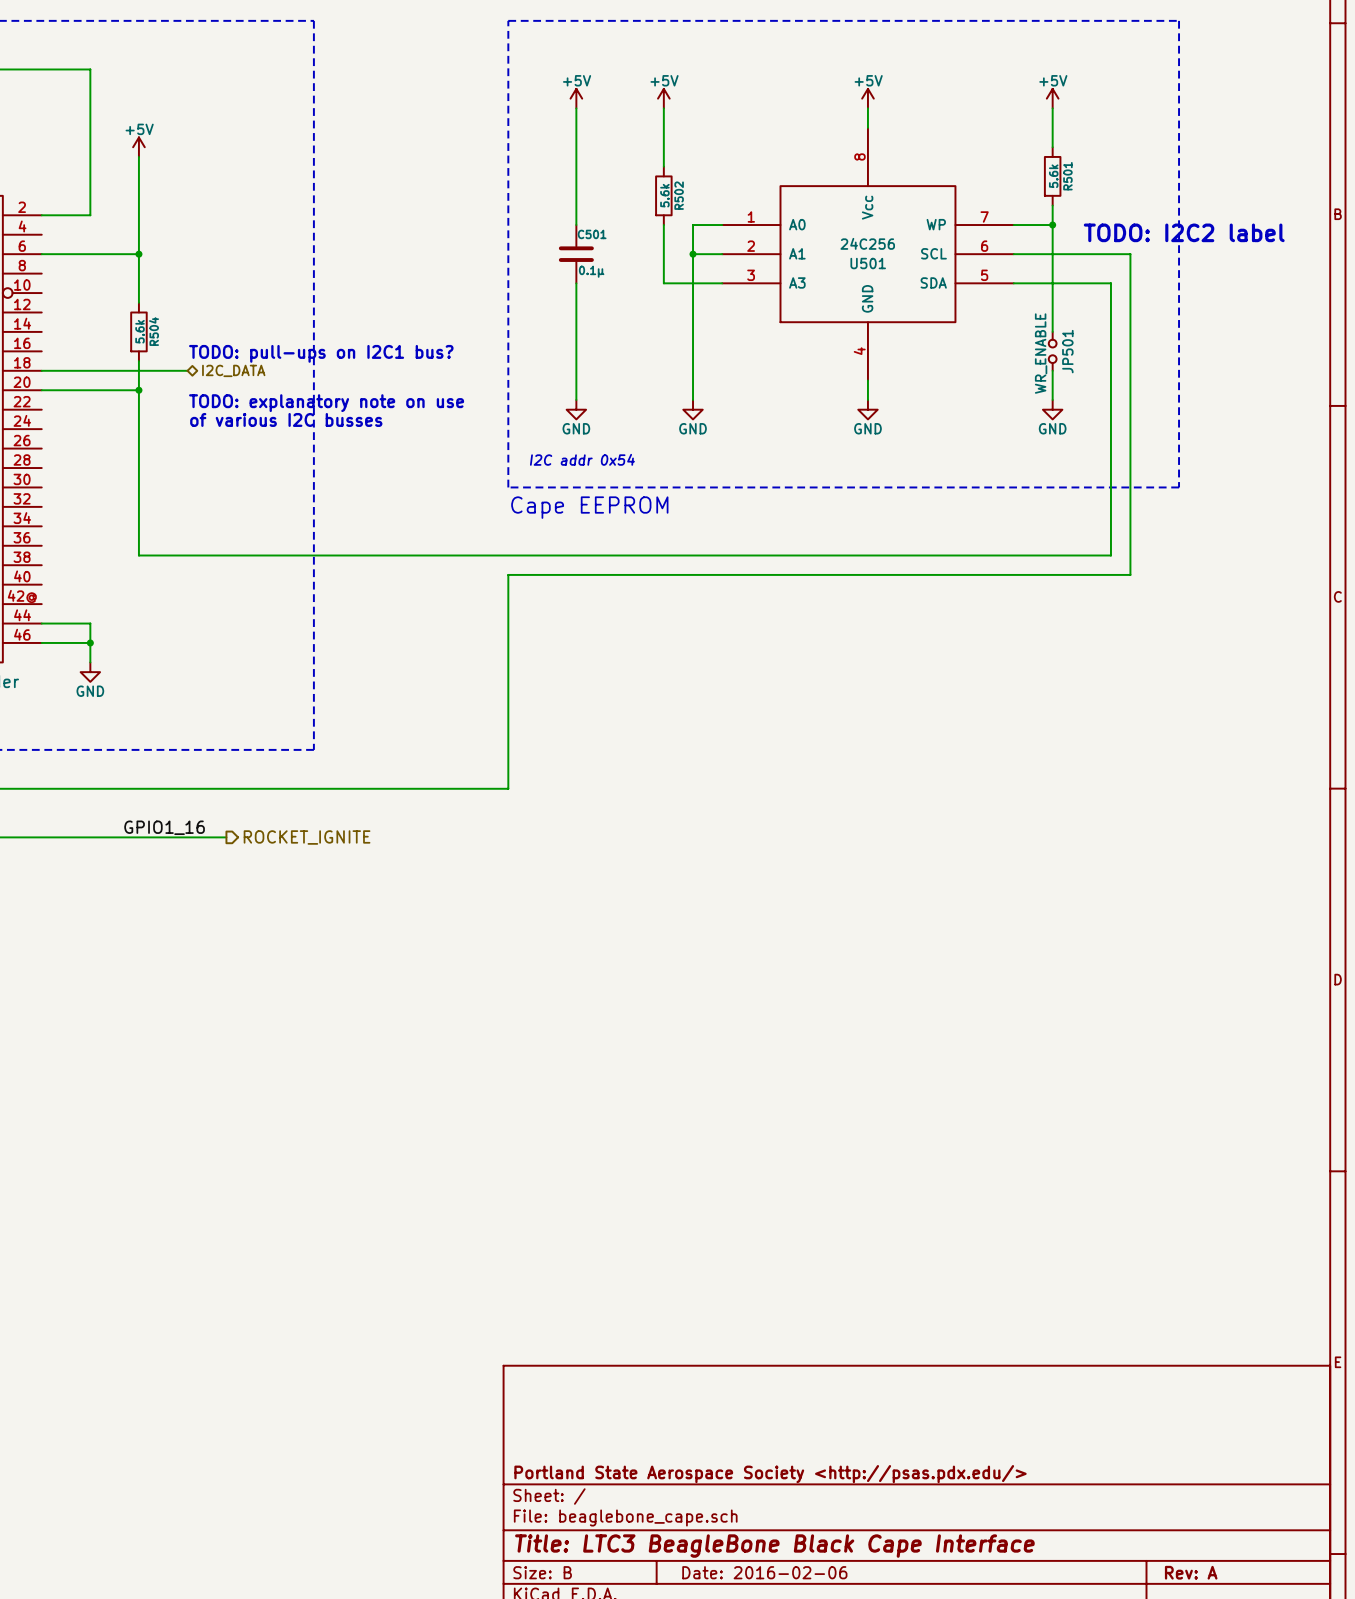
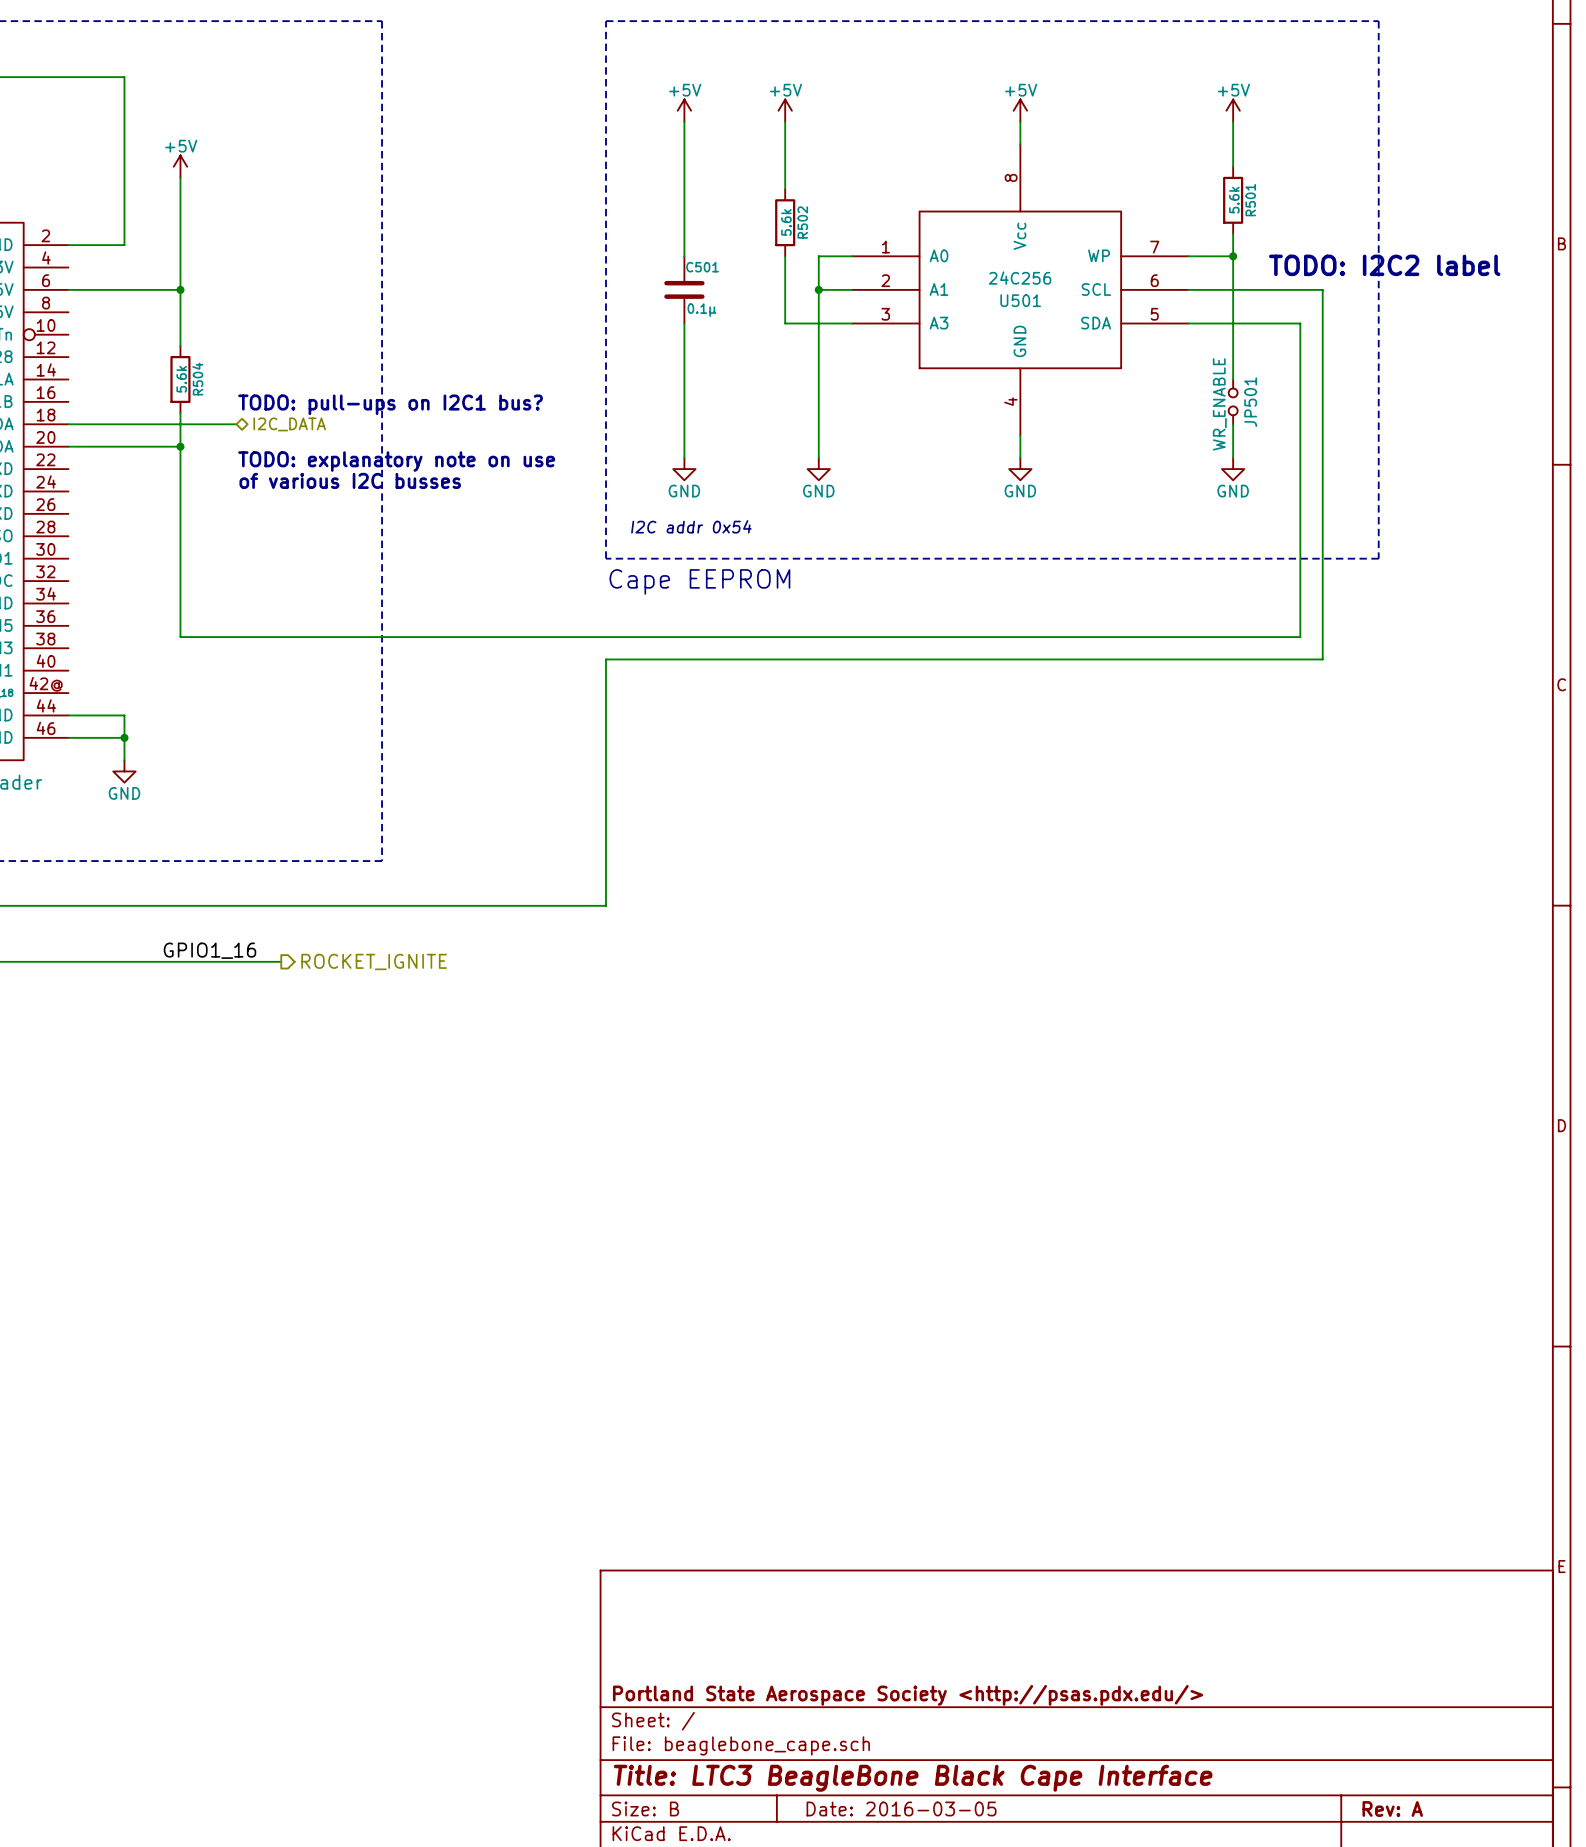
title block: Date: 2016-02-06 (764, 1572) -> Date: 2016-03-05 (901, 1808)

